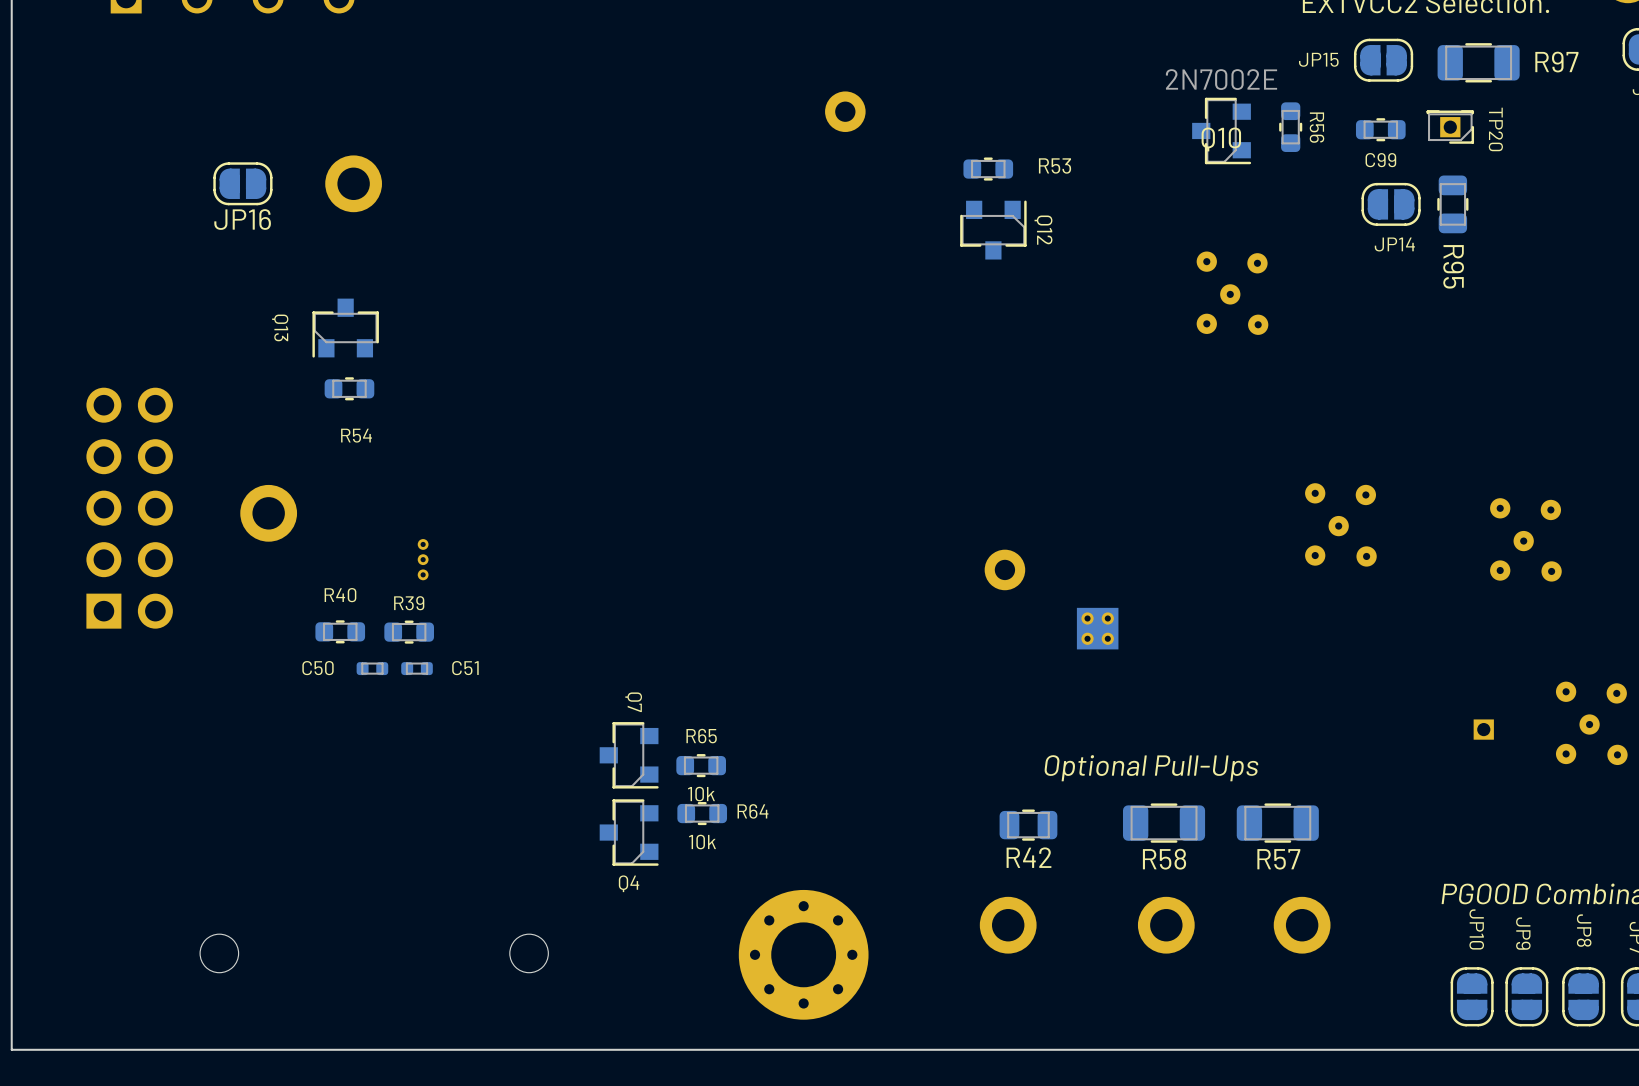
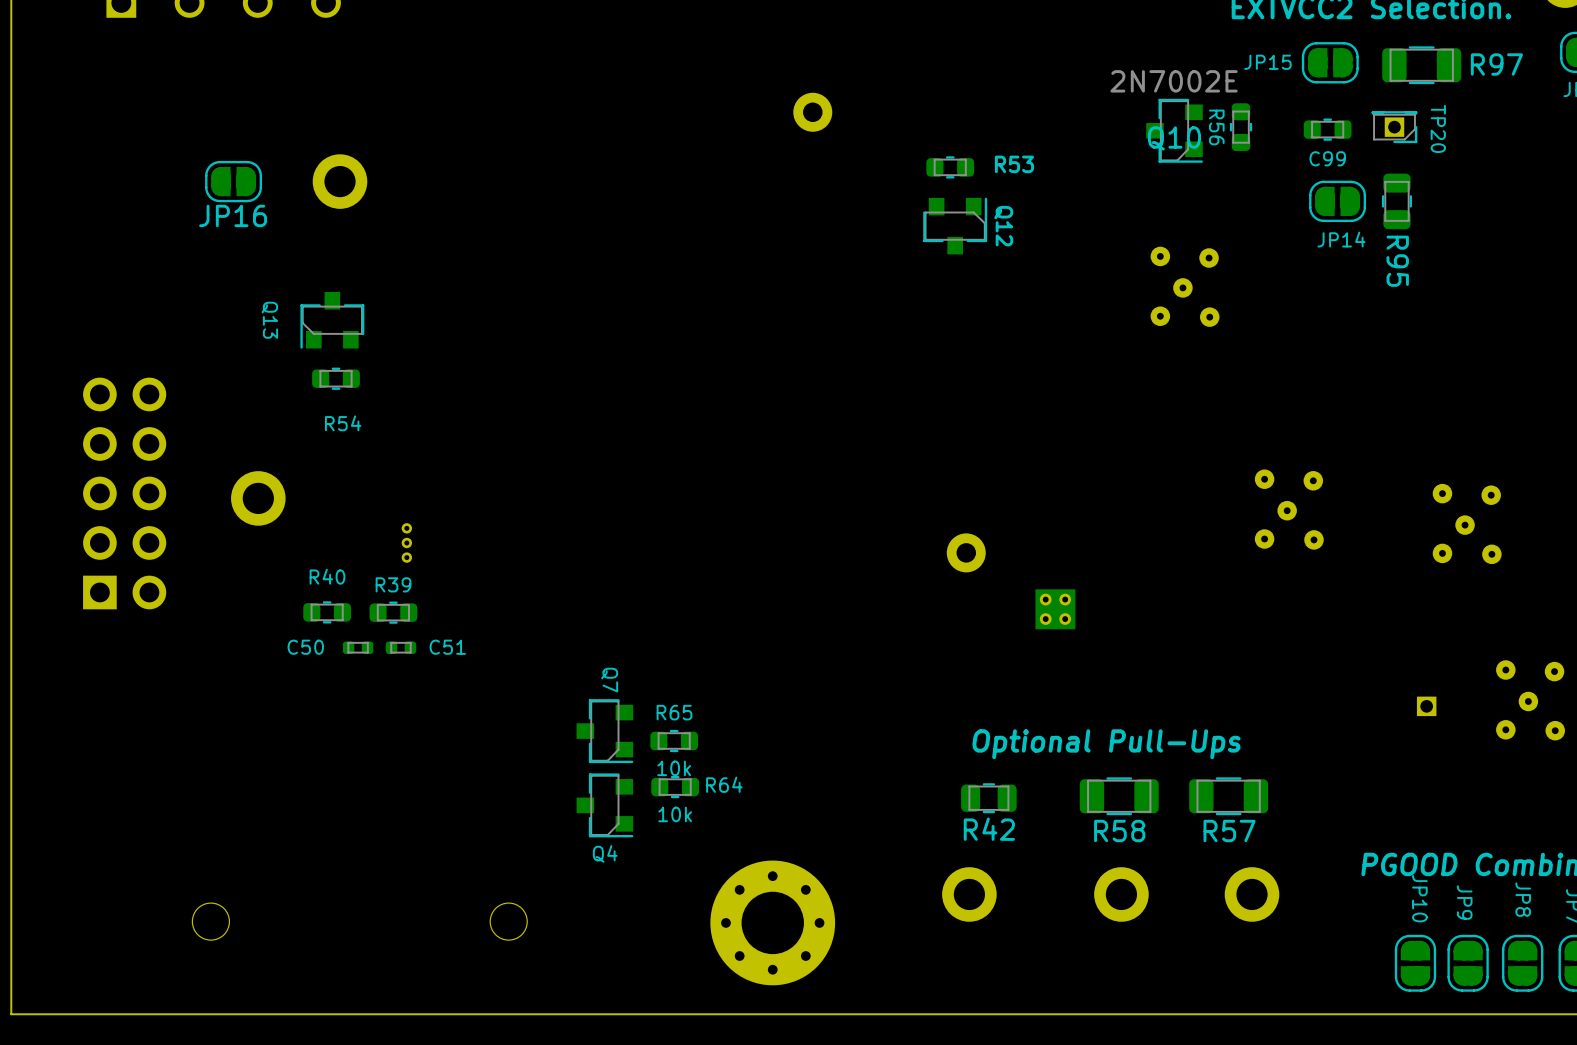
R56 name position: R56 (1316, 127) -> R56 (1216, 127)

